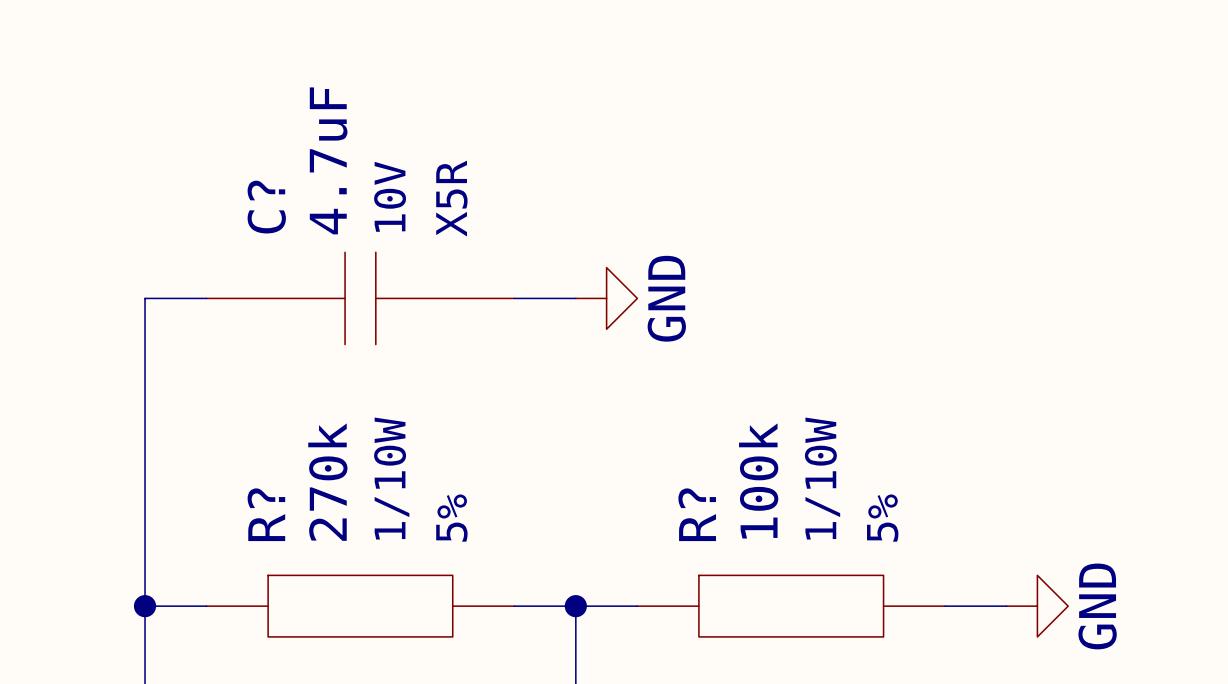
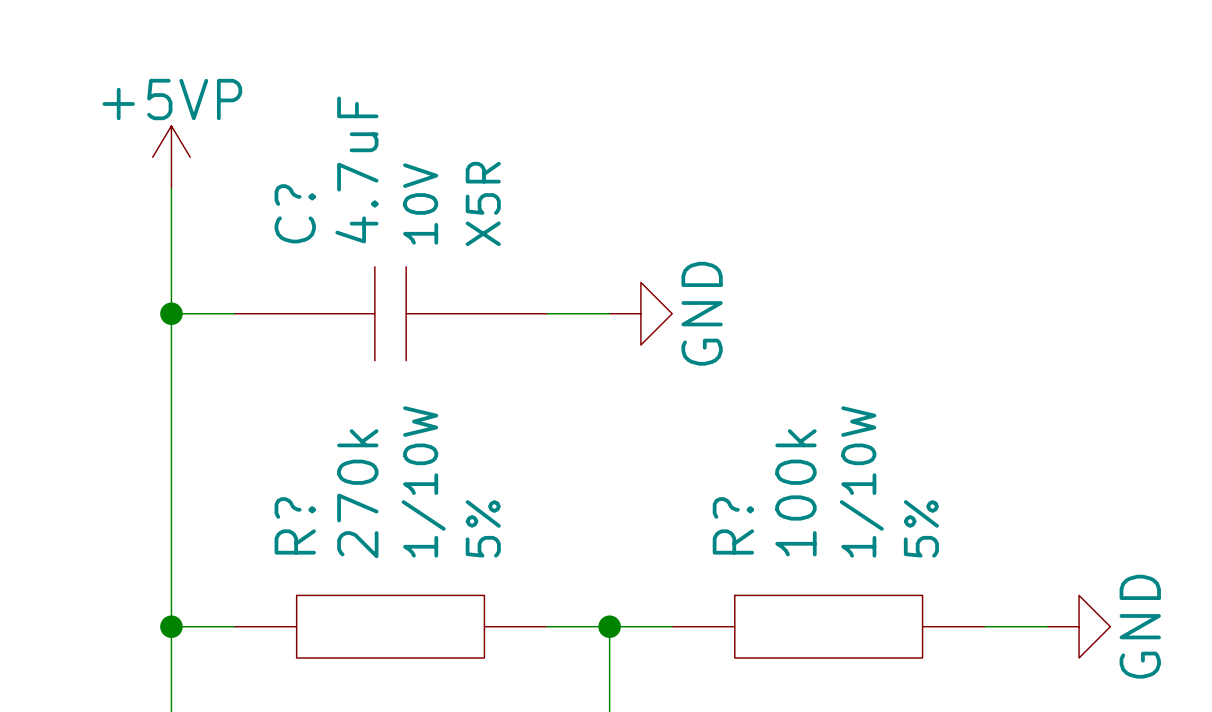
power symbol: none -> +5VP (171, 157)
wire: none -> (171, 188) (171, 313)
junction: none -> (171, 313)

